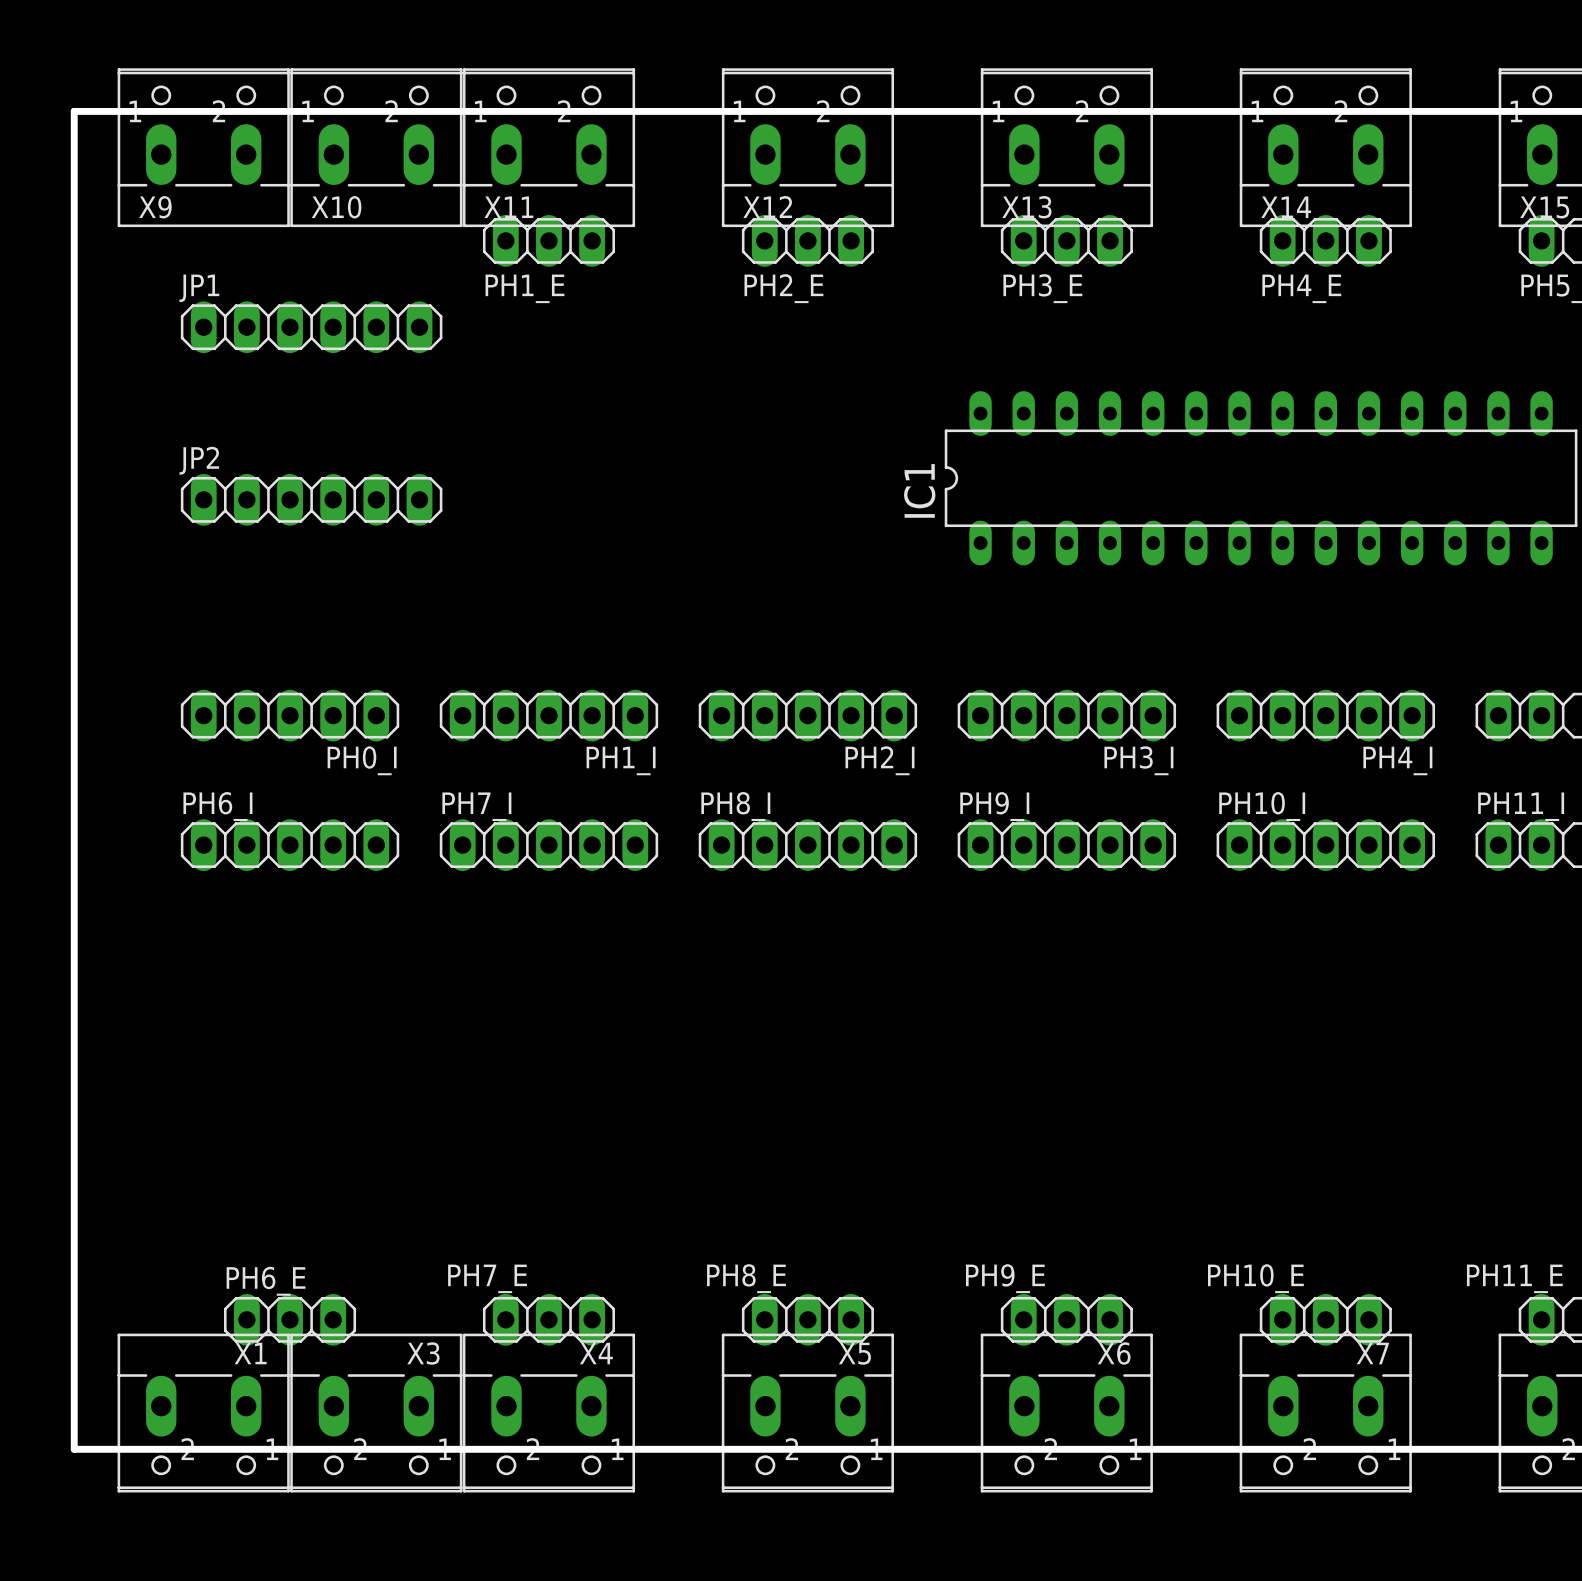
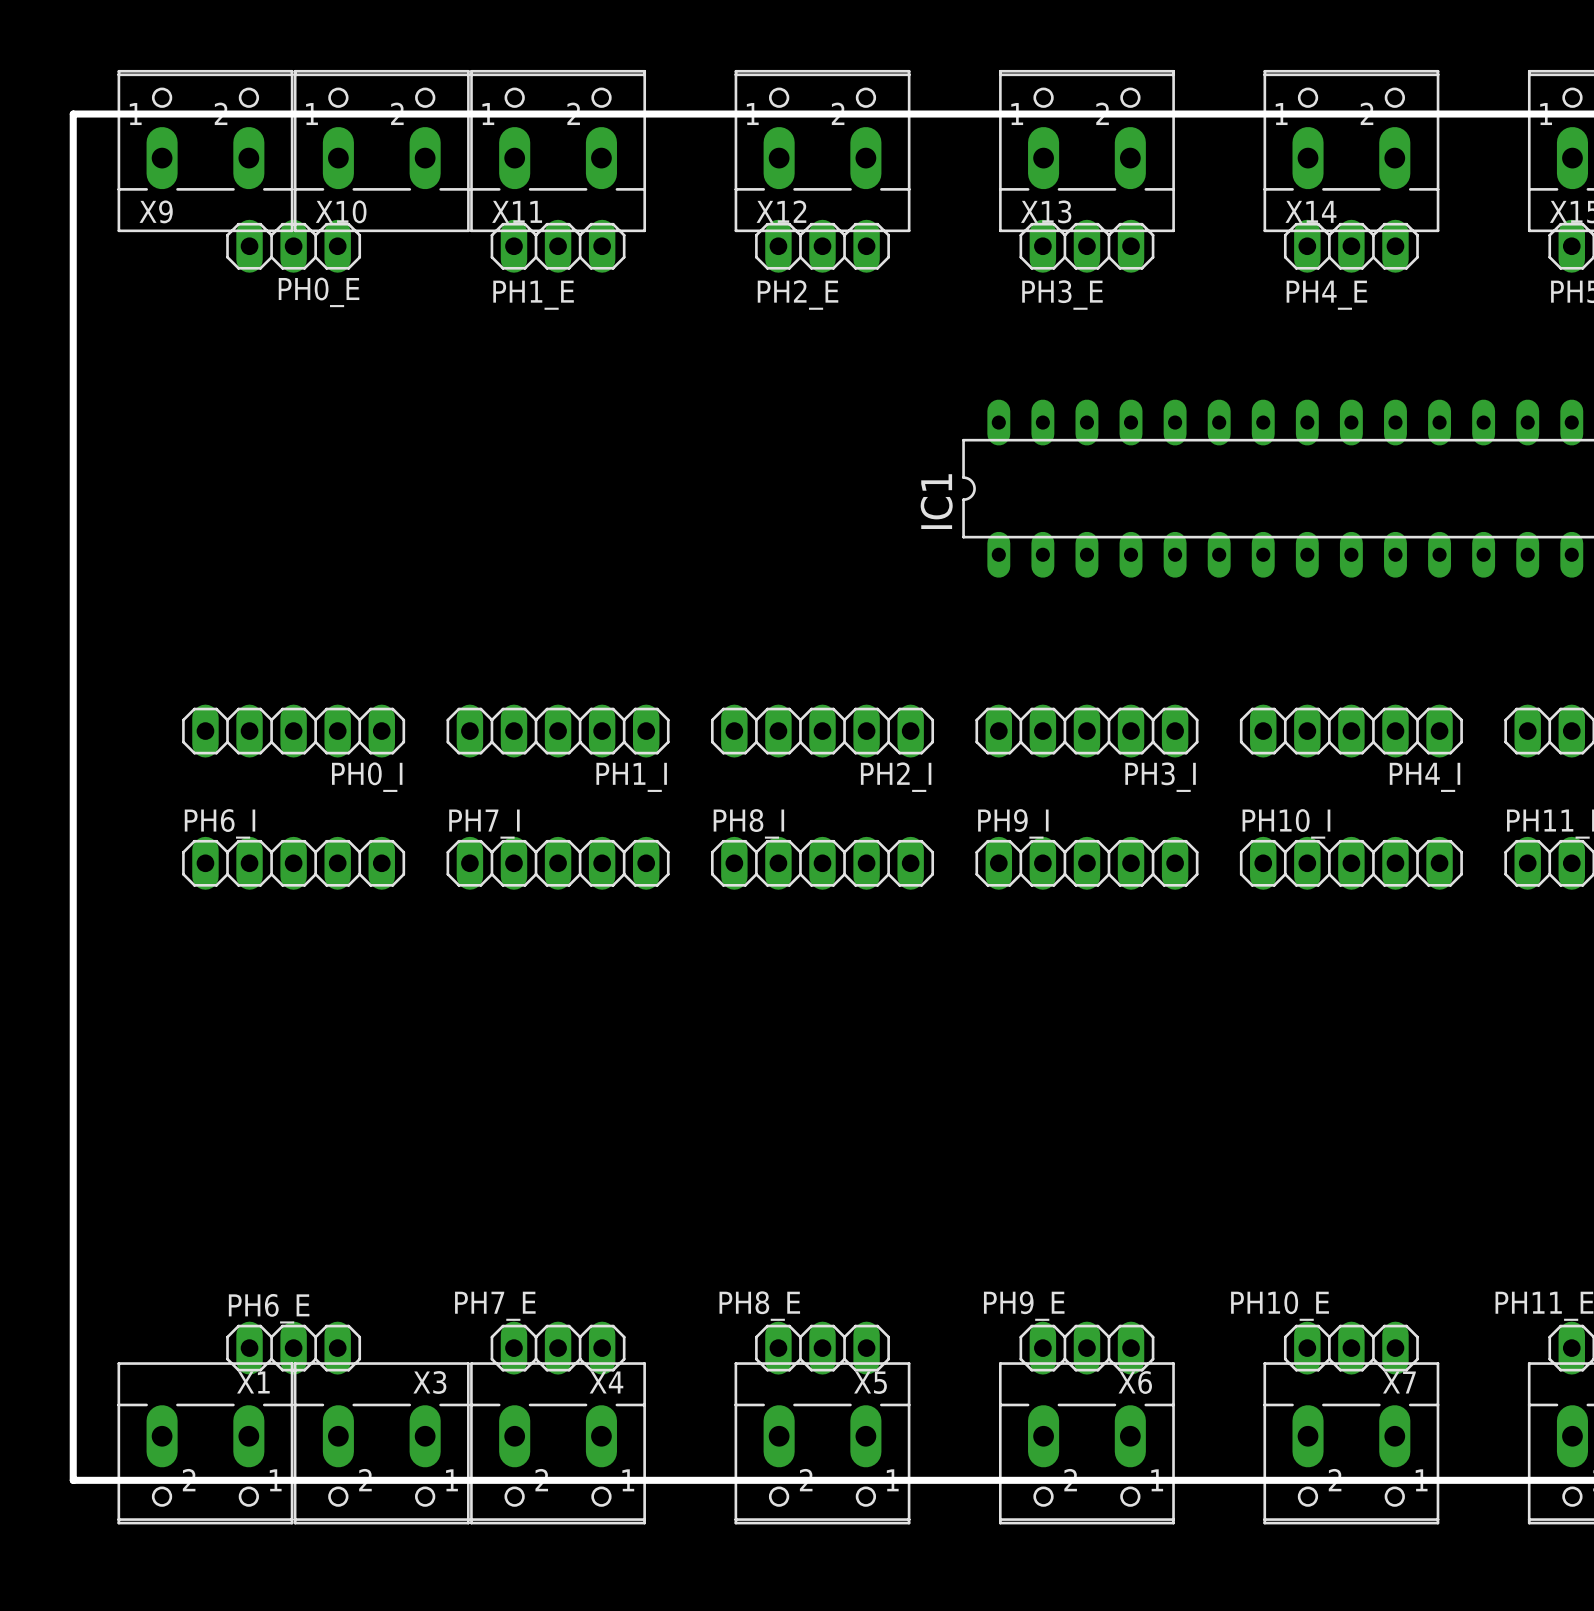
PH0_E: none -> (293, 246)
JP1: (311, 327) -> none
JP2: (311, 499) -> none

